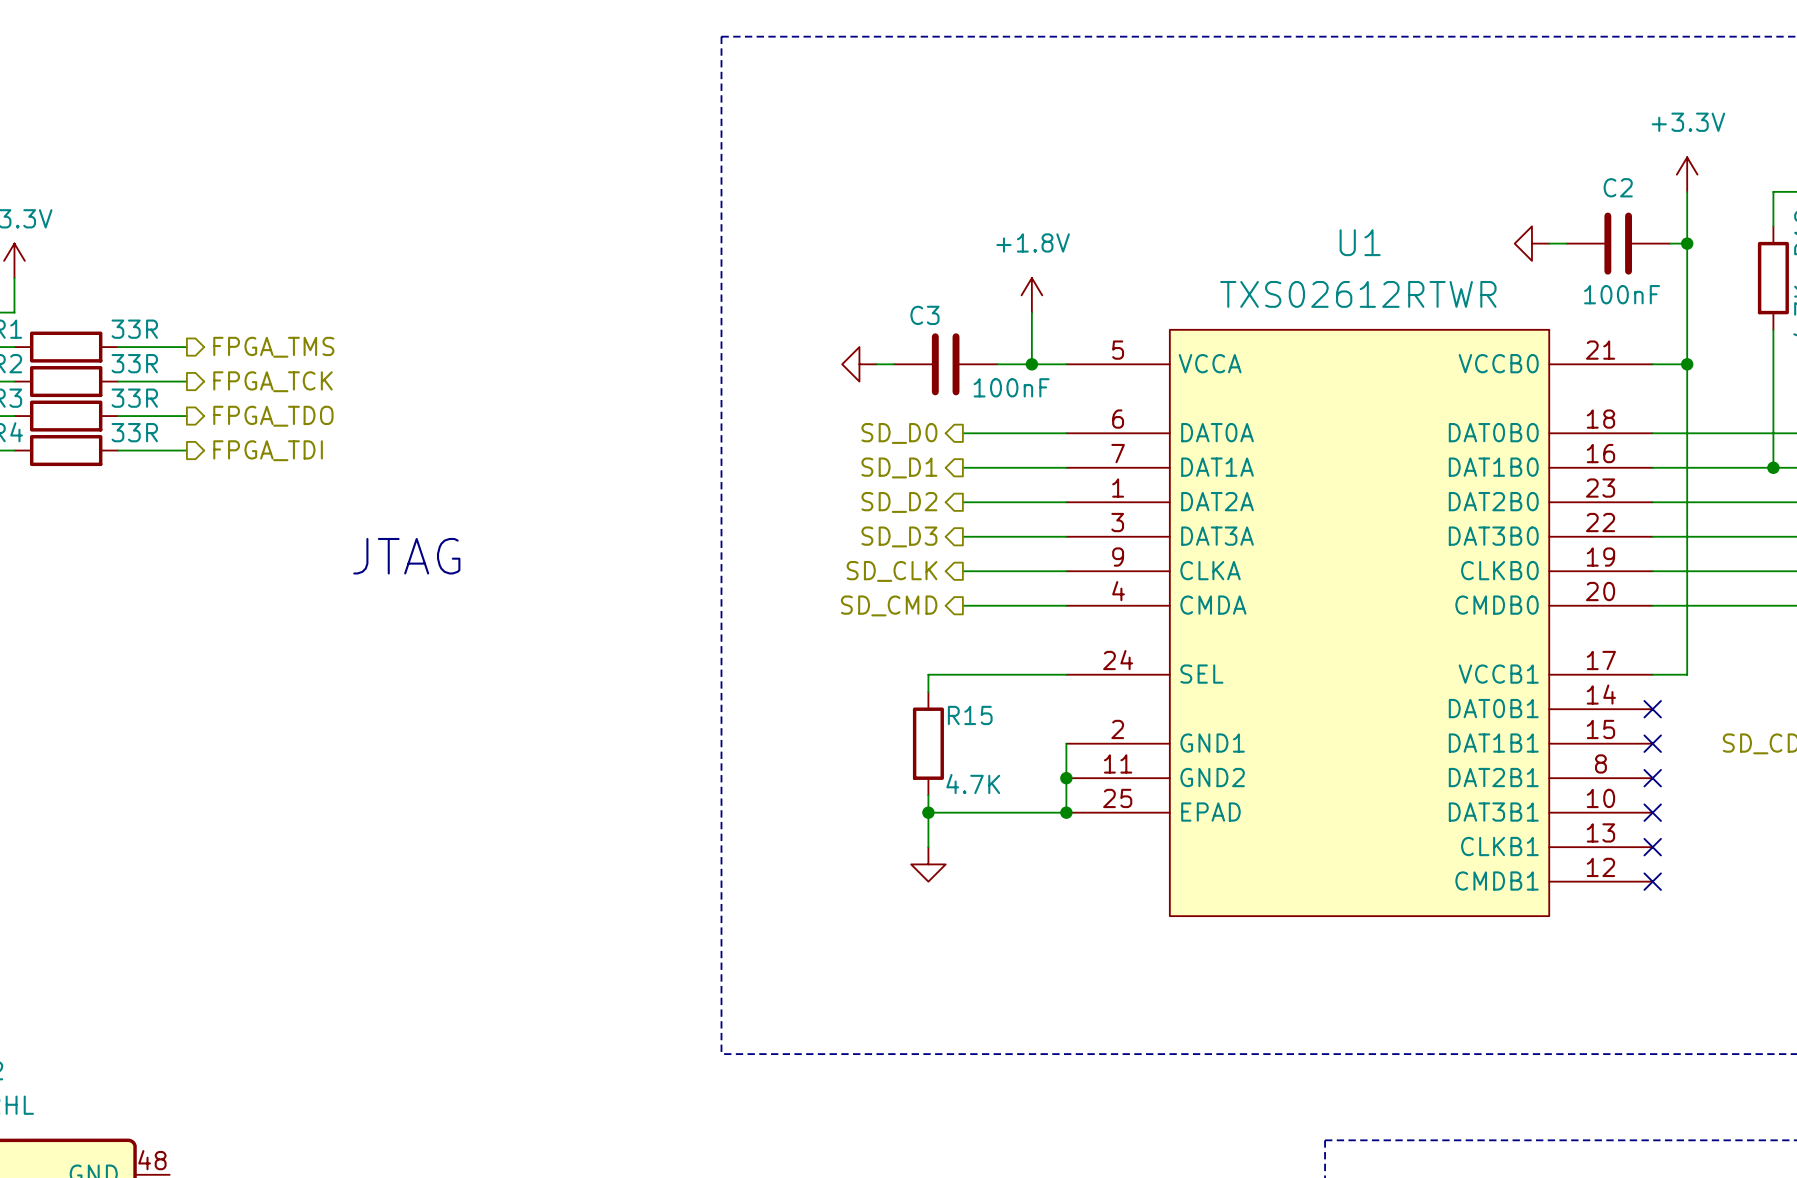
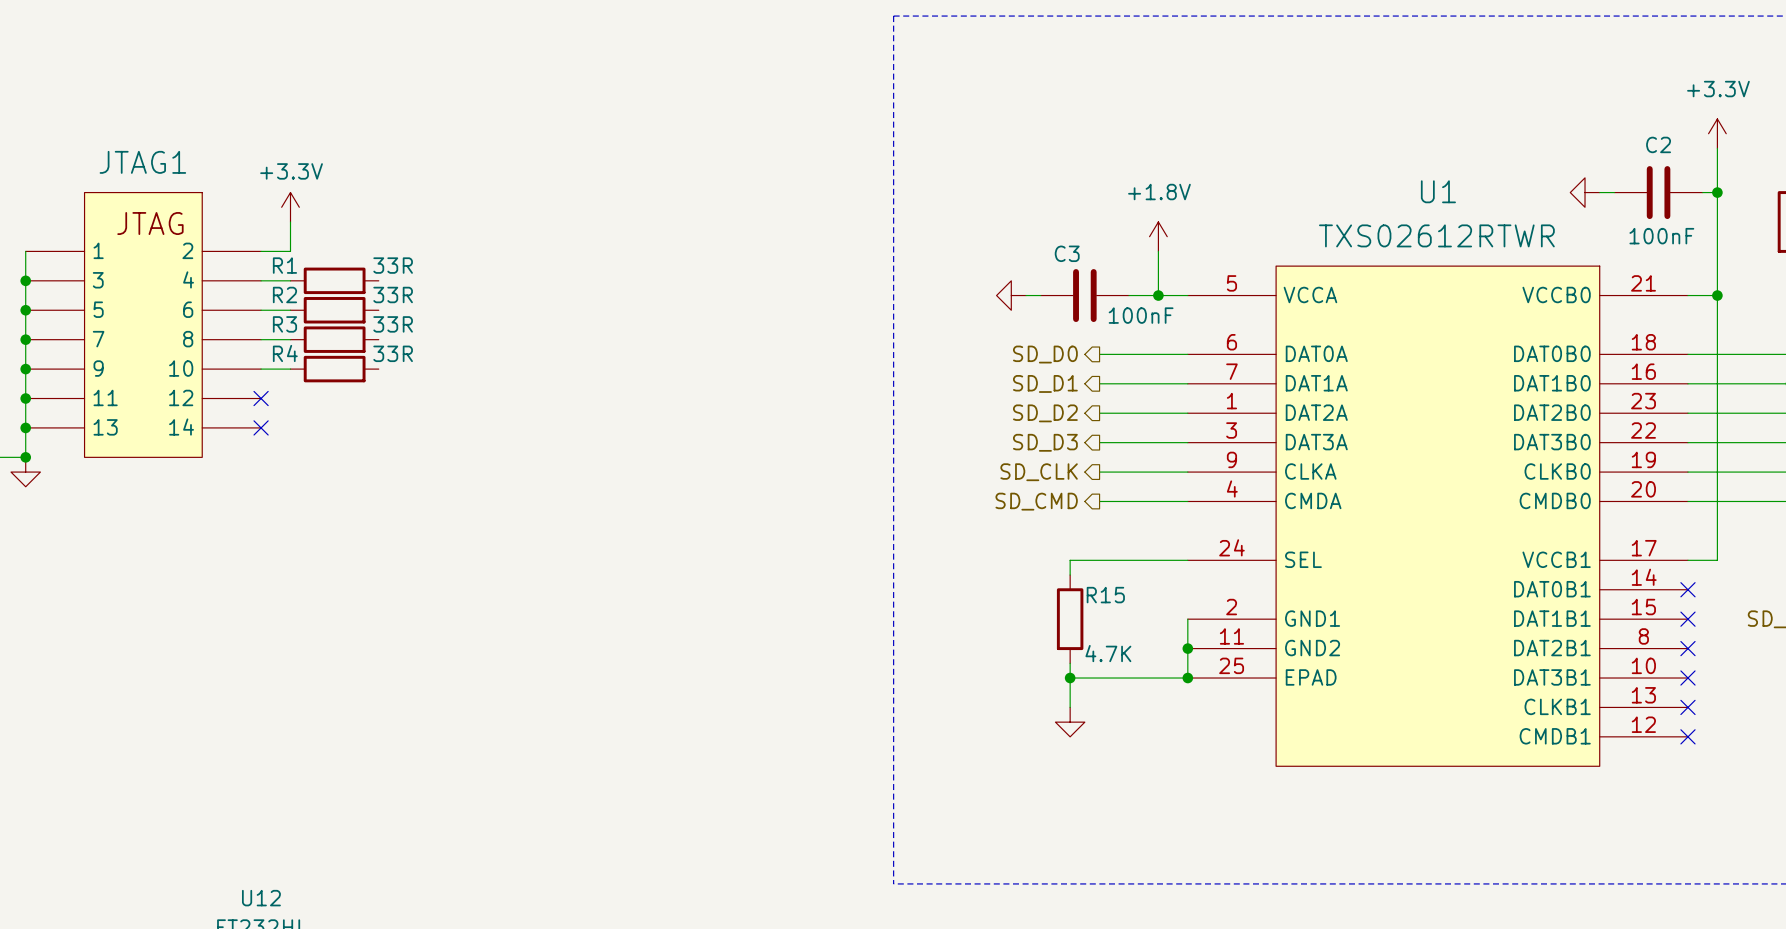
wire: (117, 347) (186, 347) -> none
hierarchical label: FPGA_TMS (273, 347) -> none
wire: (117, 381) (186, 381) -> none
hierarchical label: FPGA_TCK (272, 381) -> none
wire: (117, 416) (186, 416) -> none
hierarchical label: FPGA_TDO (273, 416) -> none
wire: (117, 450) (186, 450) -> none
hierarchical label: FPGA_TDI (268, 450) -> none
text: JTAG (406, 556) -> none

